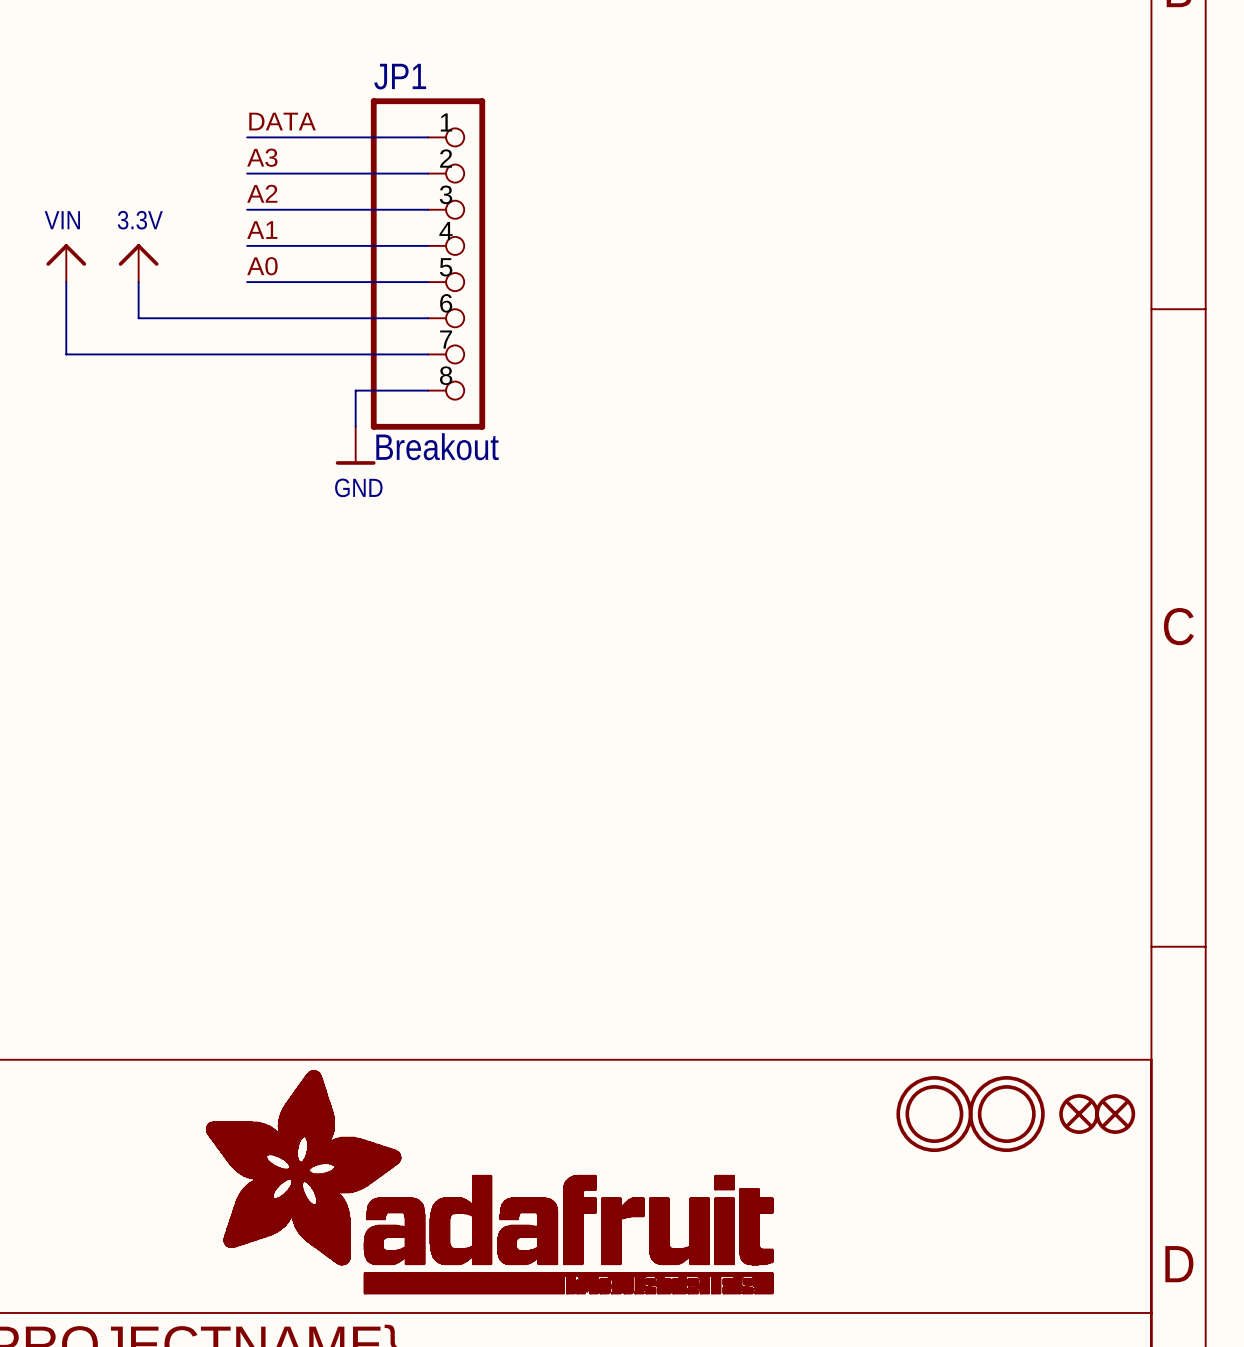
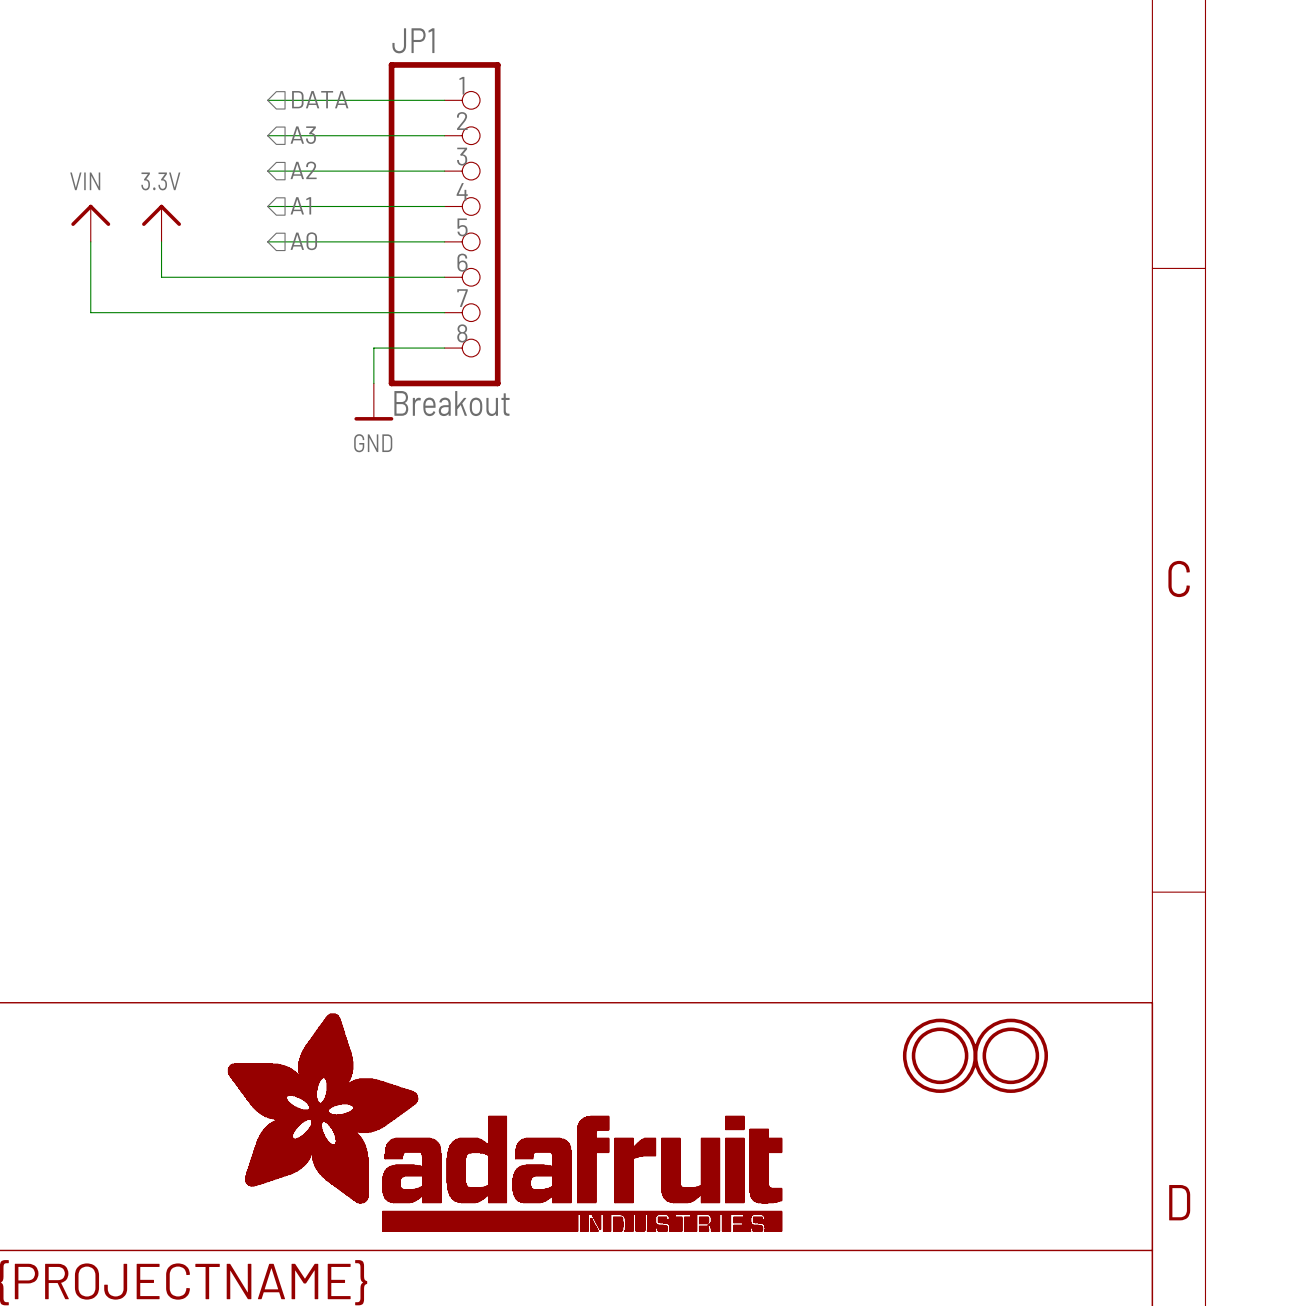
label: DATA (282, 121) -> none
hierarchical label: none -> DATA (320, 99)
label: A3 (262, 157) -> none
hierarchical label: none -> A3 (303, 135)
label: A2 (262, 193) -> none
hierarchical label: none -> A2 (303, 170)
label: A1 (262, 230) -> none
hierarchical label: none -> A1 (300, 205)
label: A0 (262, 266) -> none
hierarchical label: none -> A0 (303, 241)
part: (1079, 1114) -> none
part: (1115, 1114) -> none

